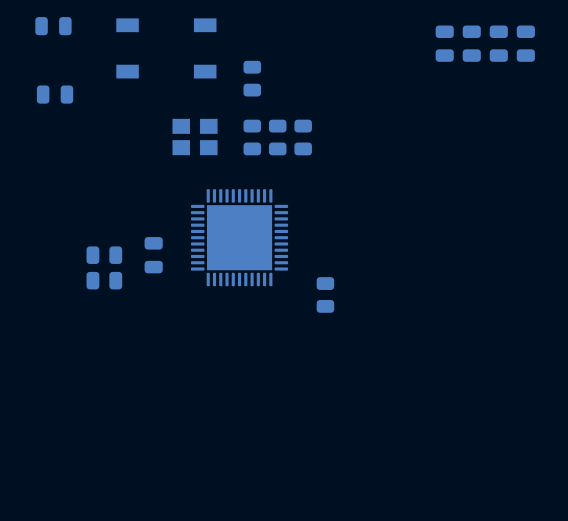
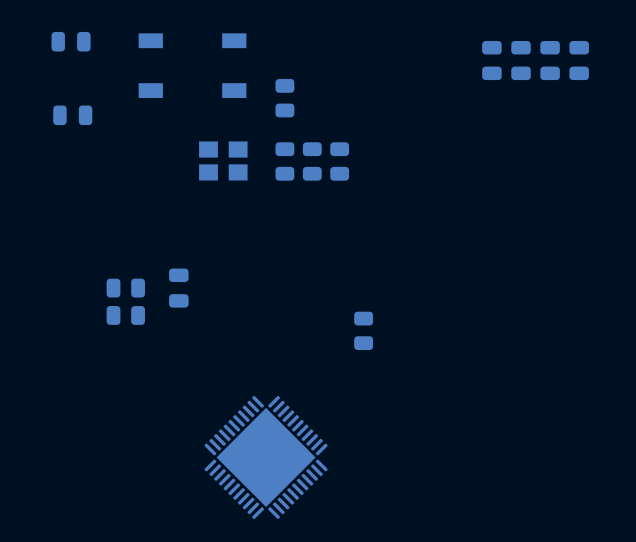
part: (239, 237) -> none
part: none -> (266, 457)

